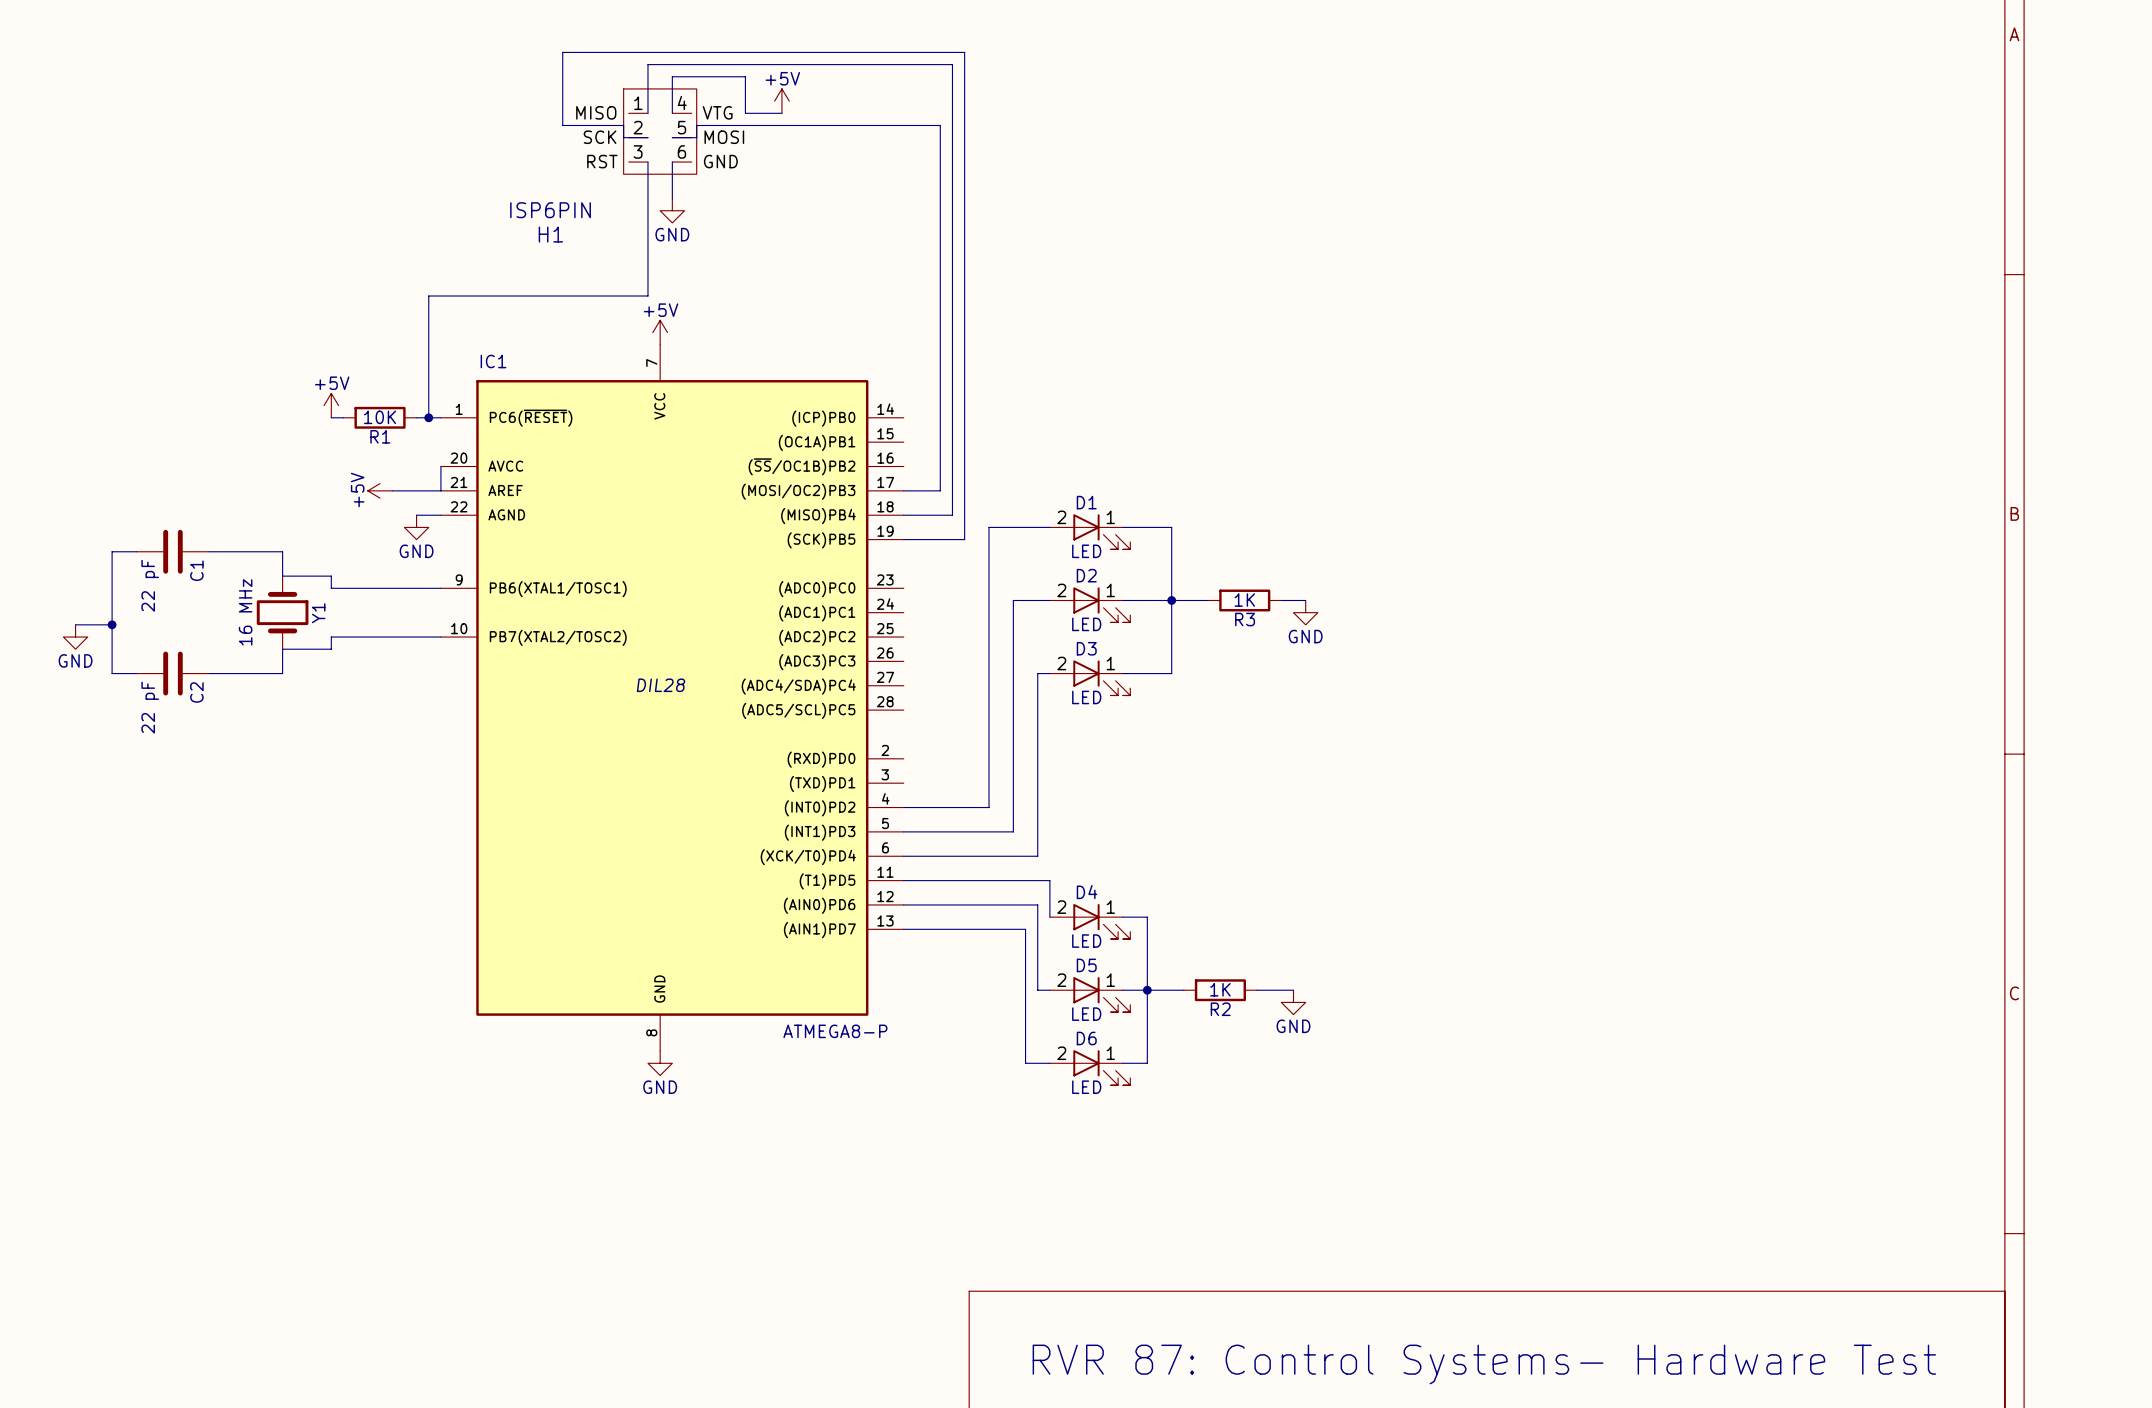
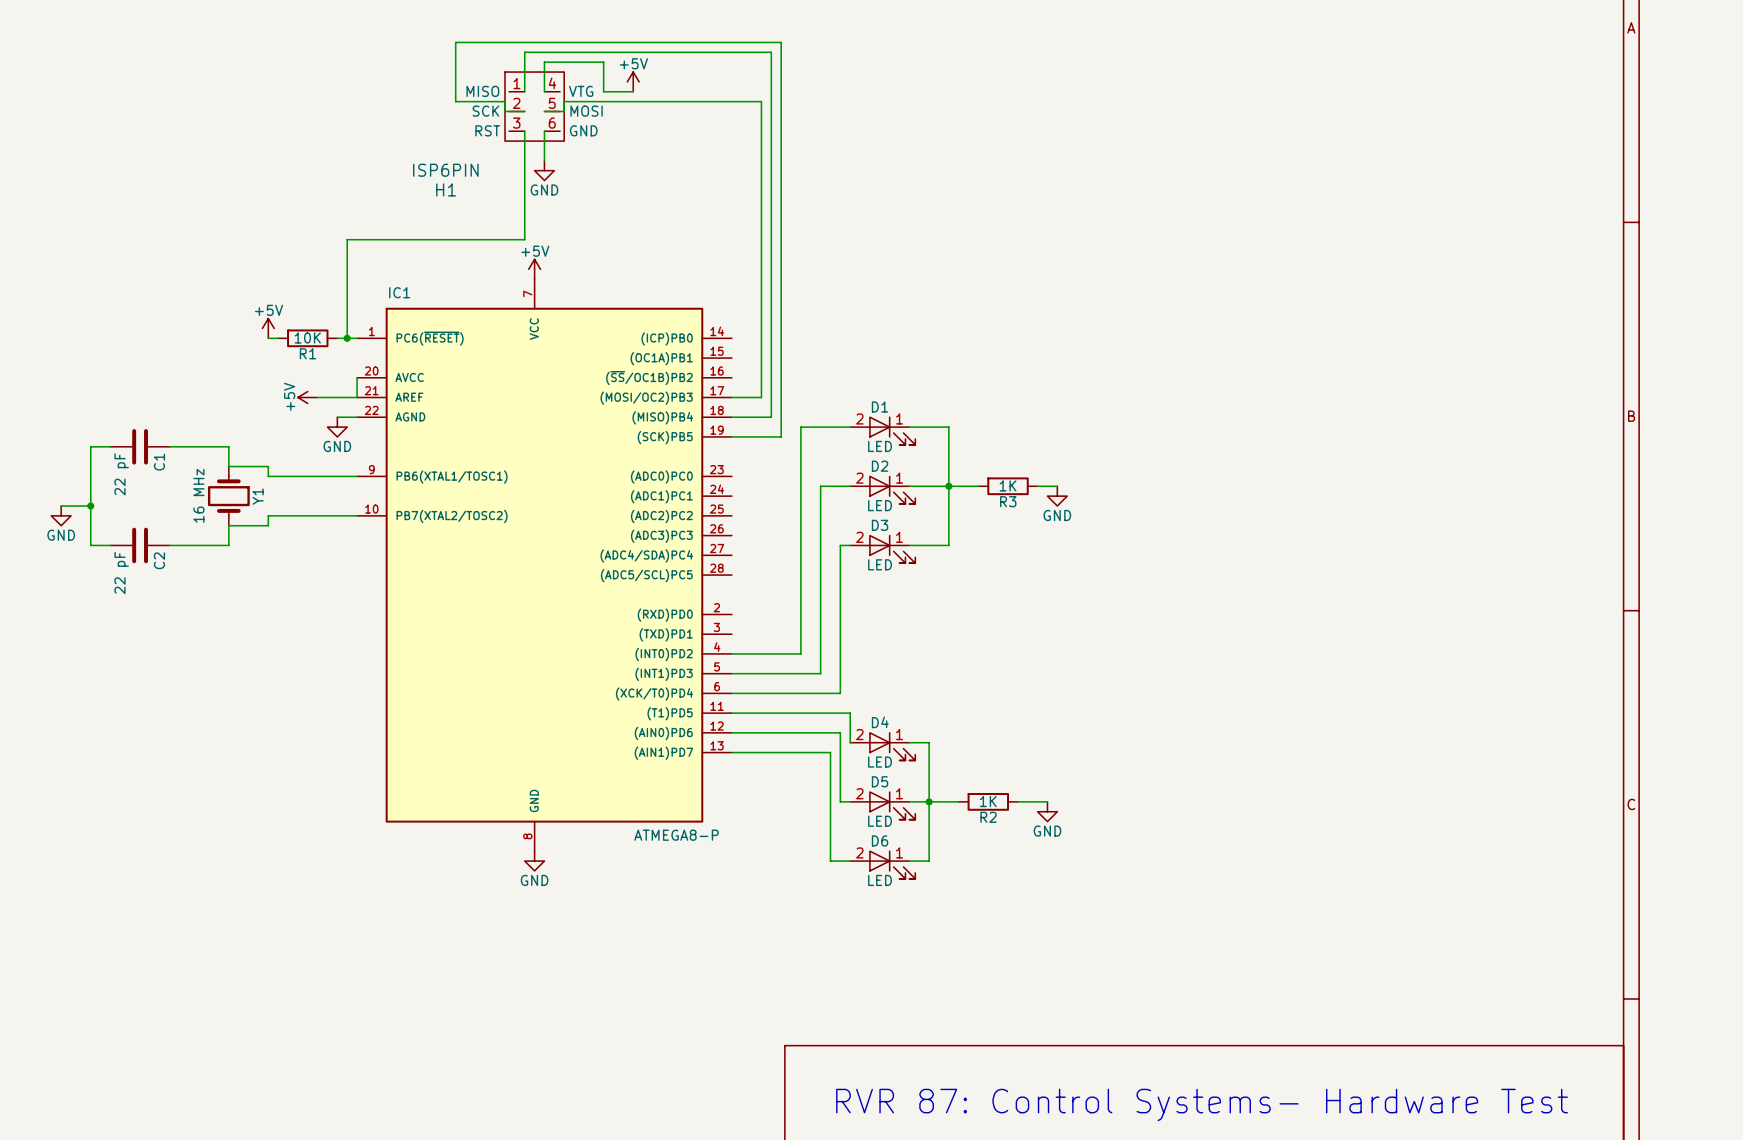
IC1 text: DIL28 (661, 685) -> none

